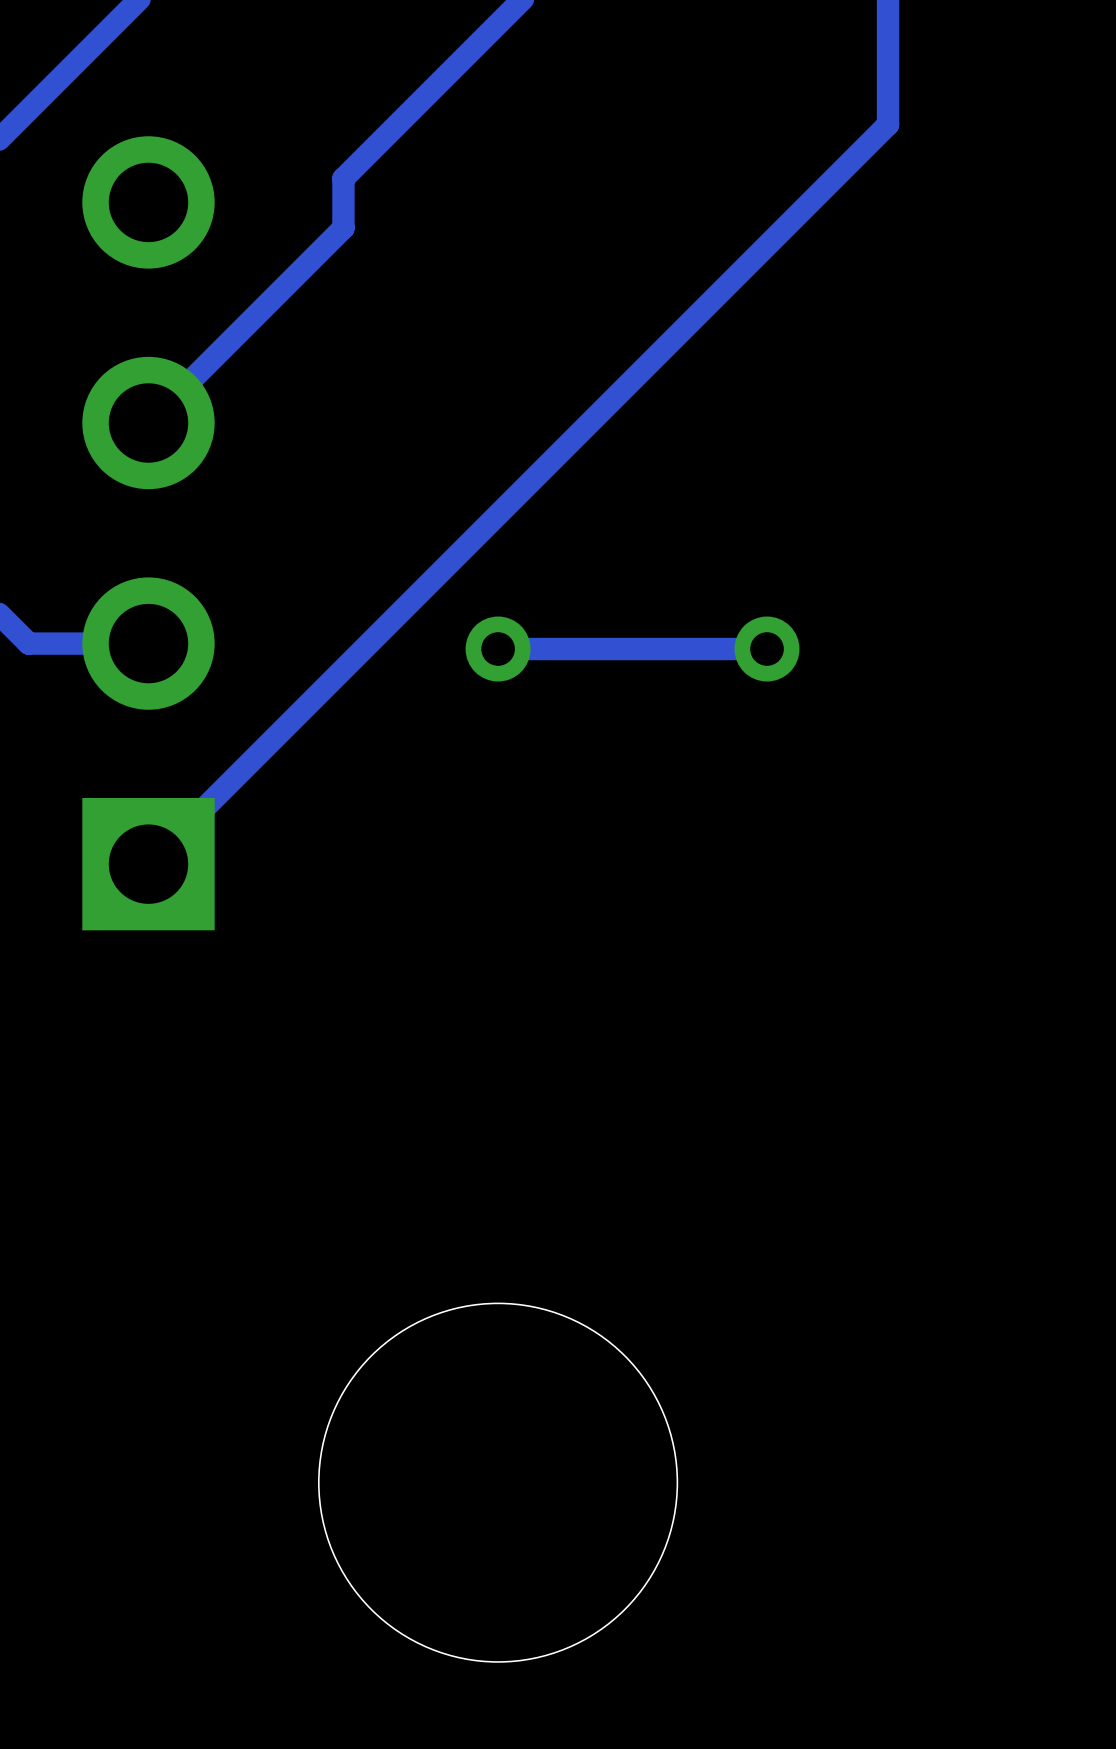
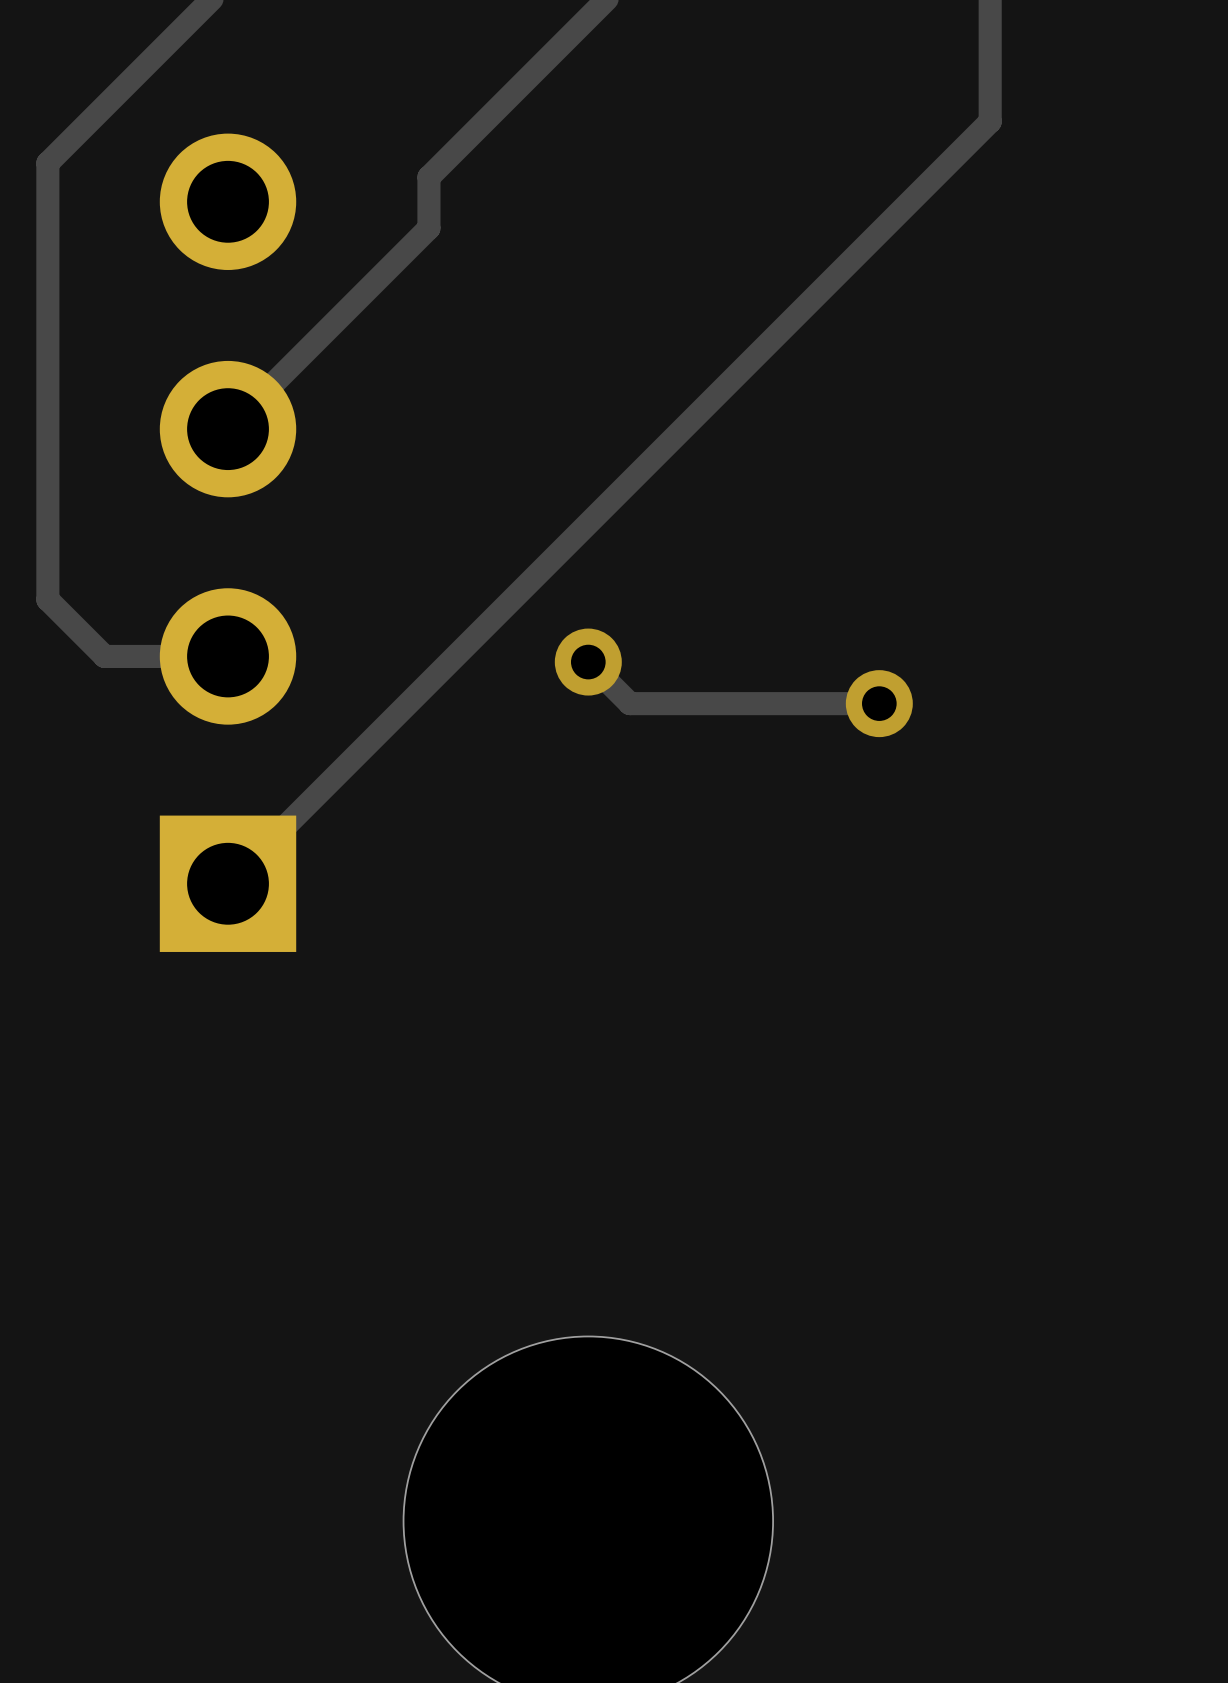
track: (767, 649) (498, 649) -> (879, 703) (629, 703) (588, 662)
via position: (767, 649) -> (879, 703)

